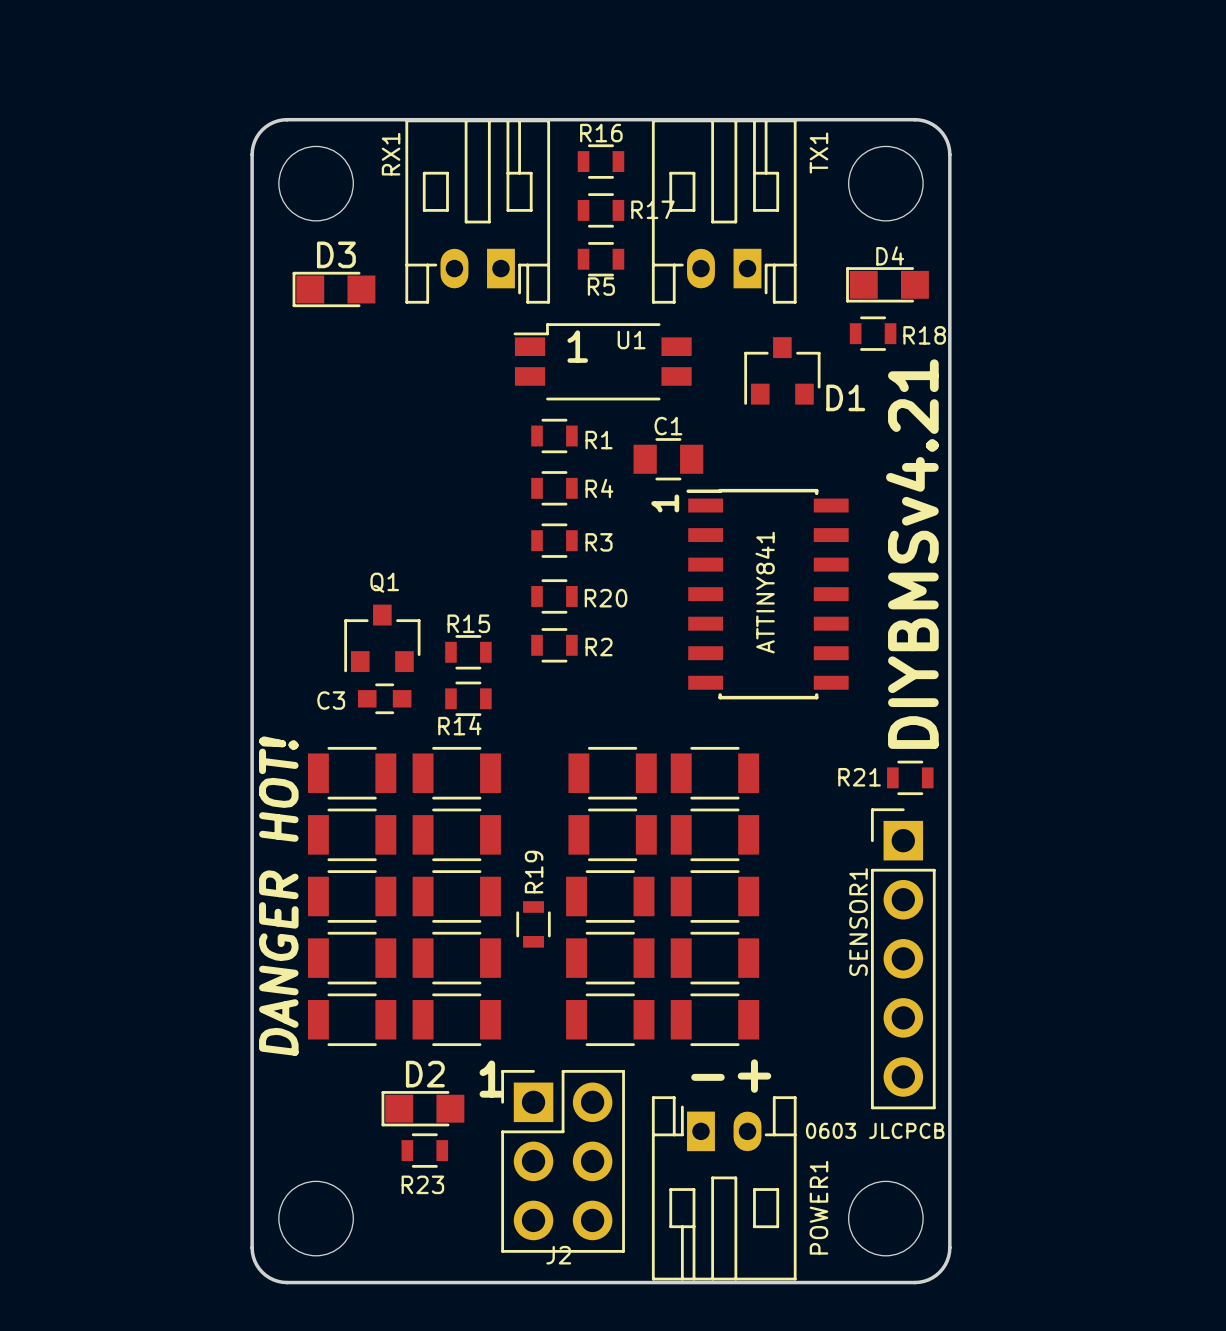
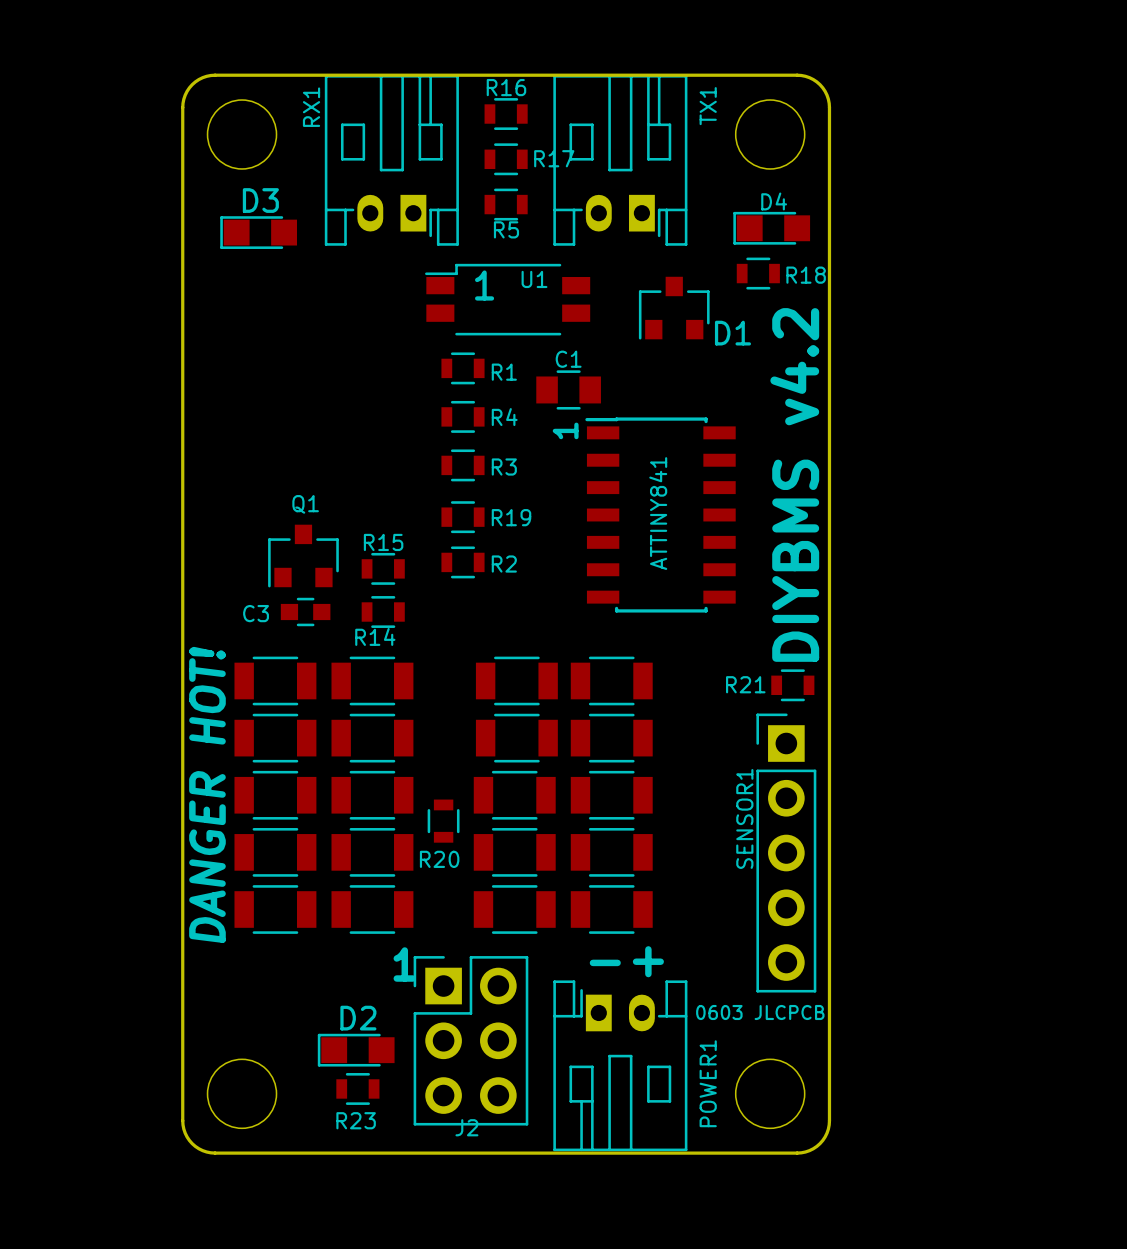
text: DIYBMSv4.21 (912, 554) -> DIYBMS v4.2 (794, 484)
R20 name: R20 (606, 598) -> R19 (511, 517)
R19 name: R19 (534, 872) -> R20 (439, 859)
D2 position: (422, 1108) -> (356, 1050)
R23 position: (424, 1150) -> (357, 1088)

